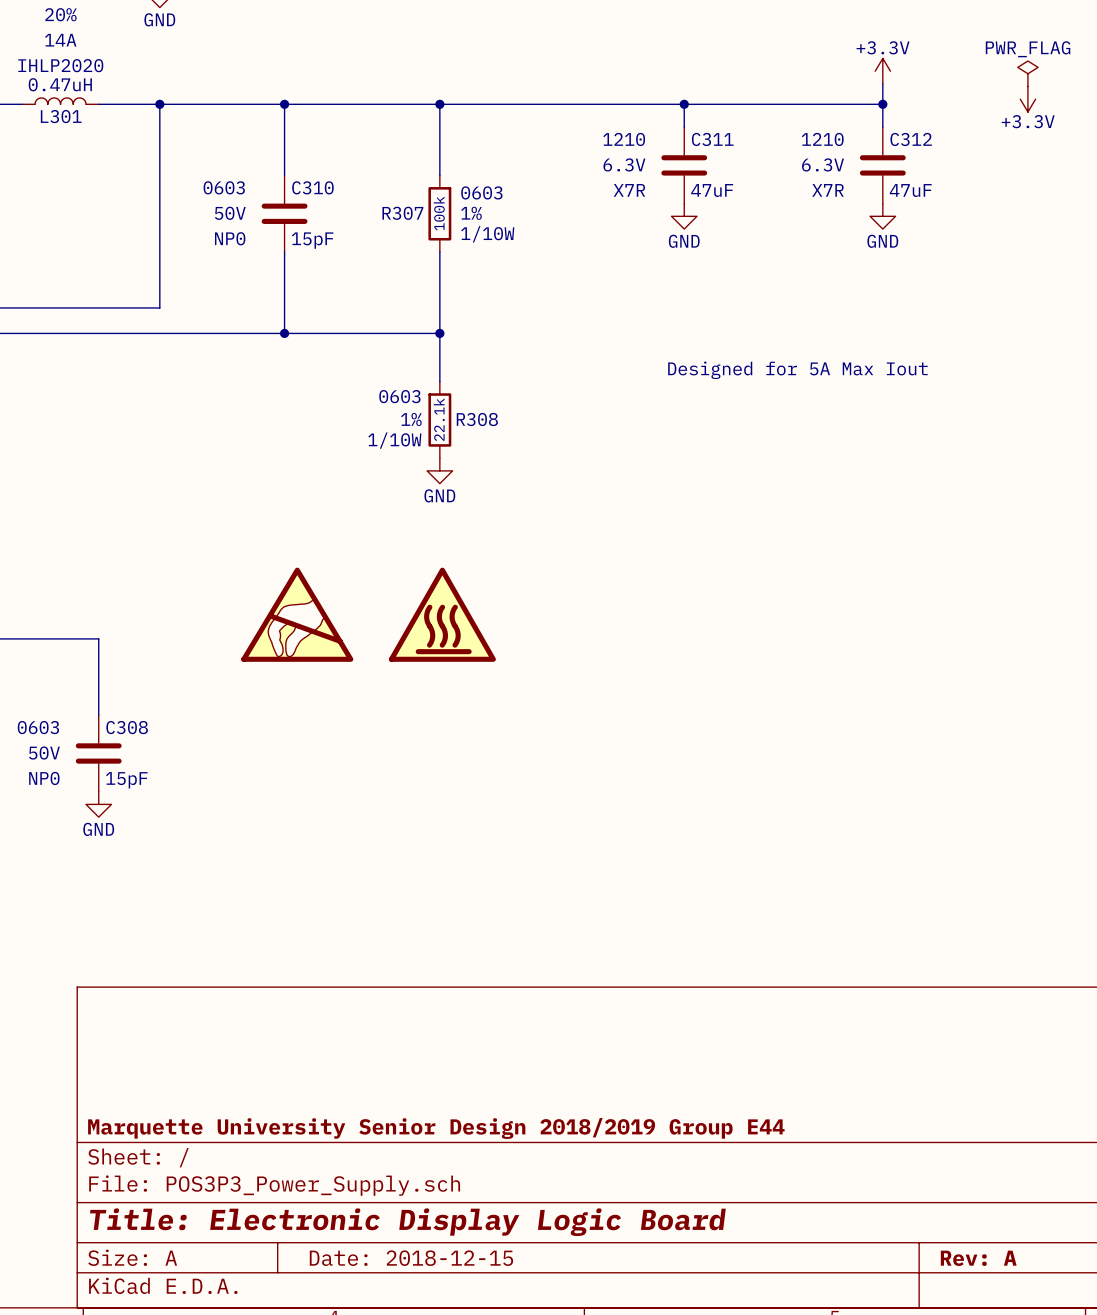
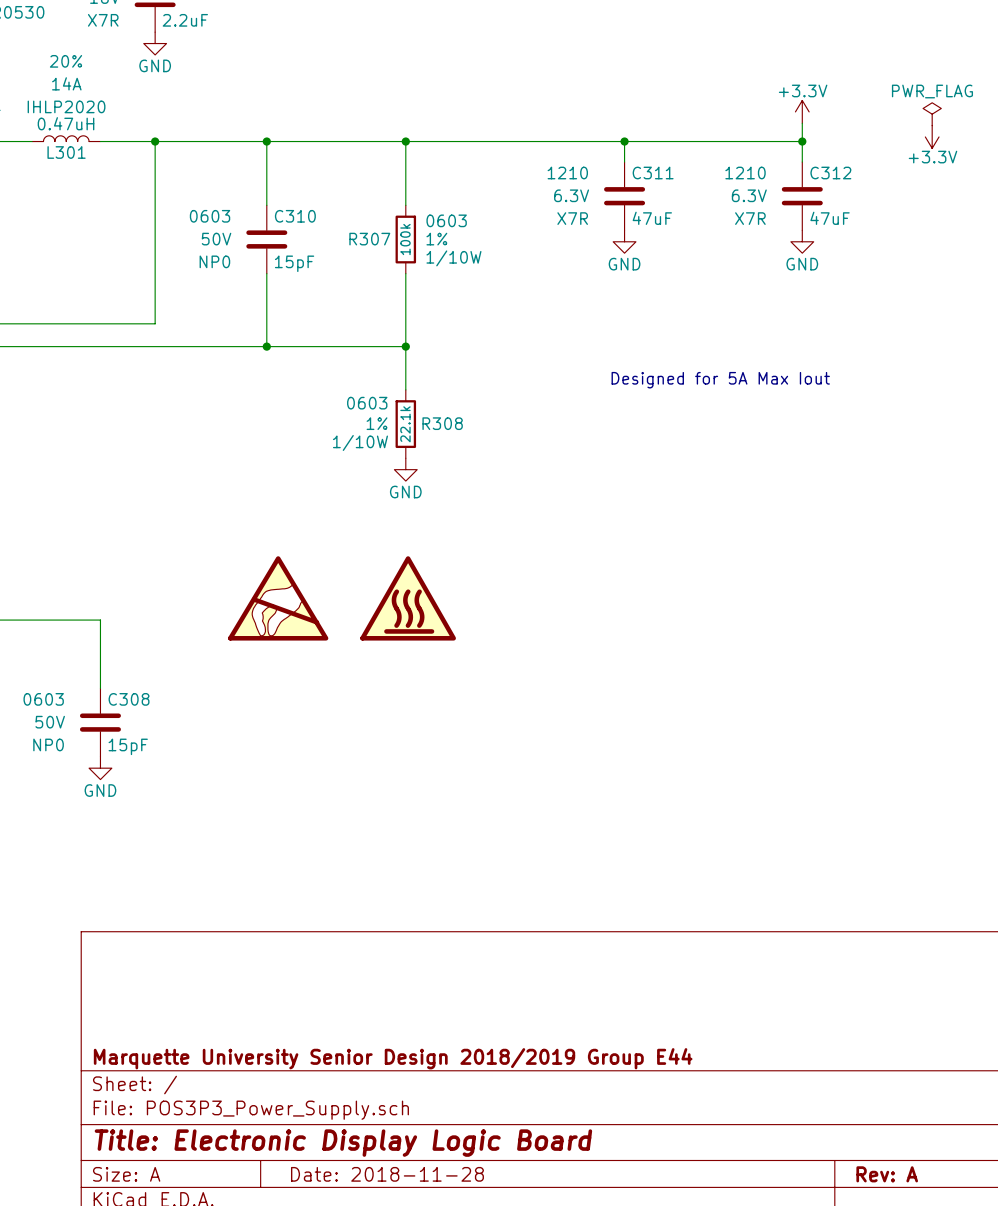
title block: Date: 2018-12-15 (411, 1258) -> Date: 2018-11-28 (387, 1174)

